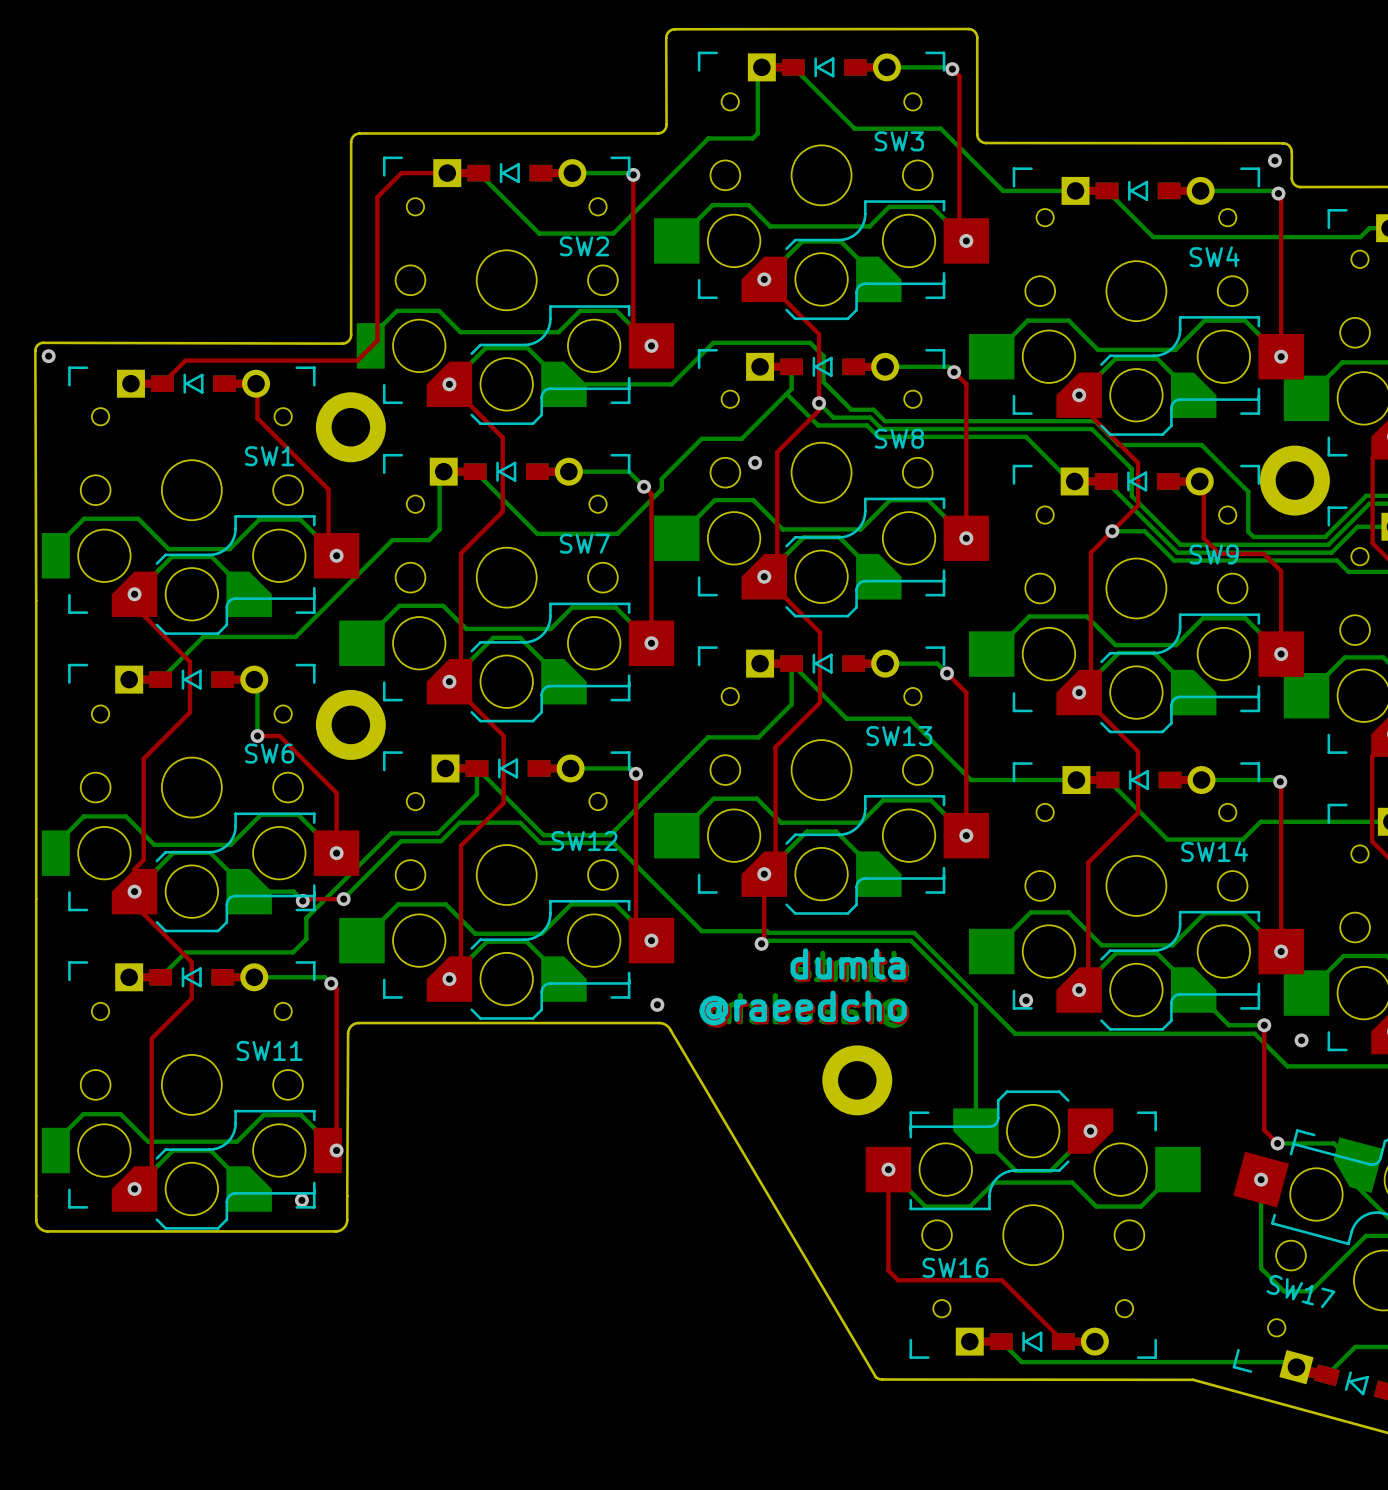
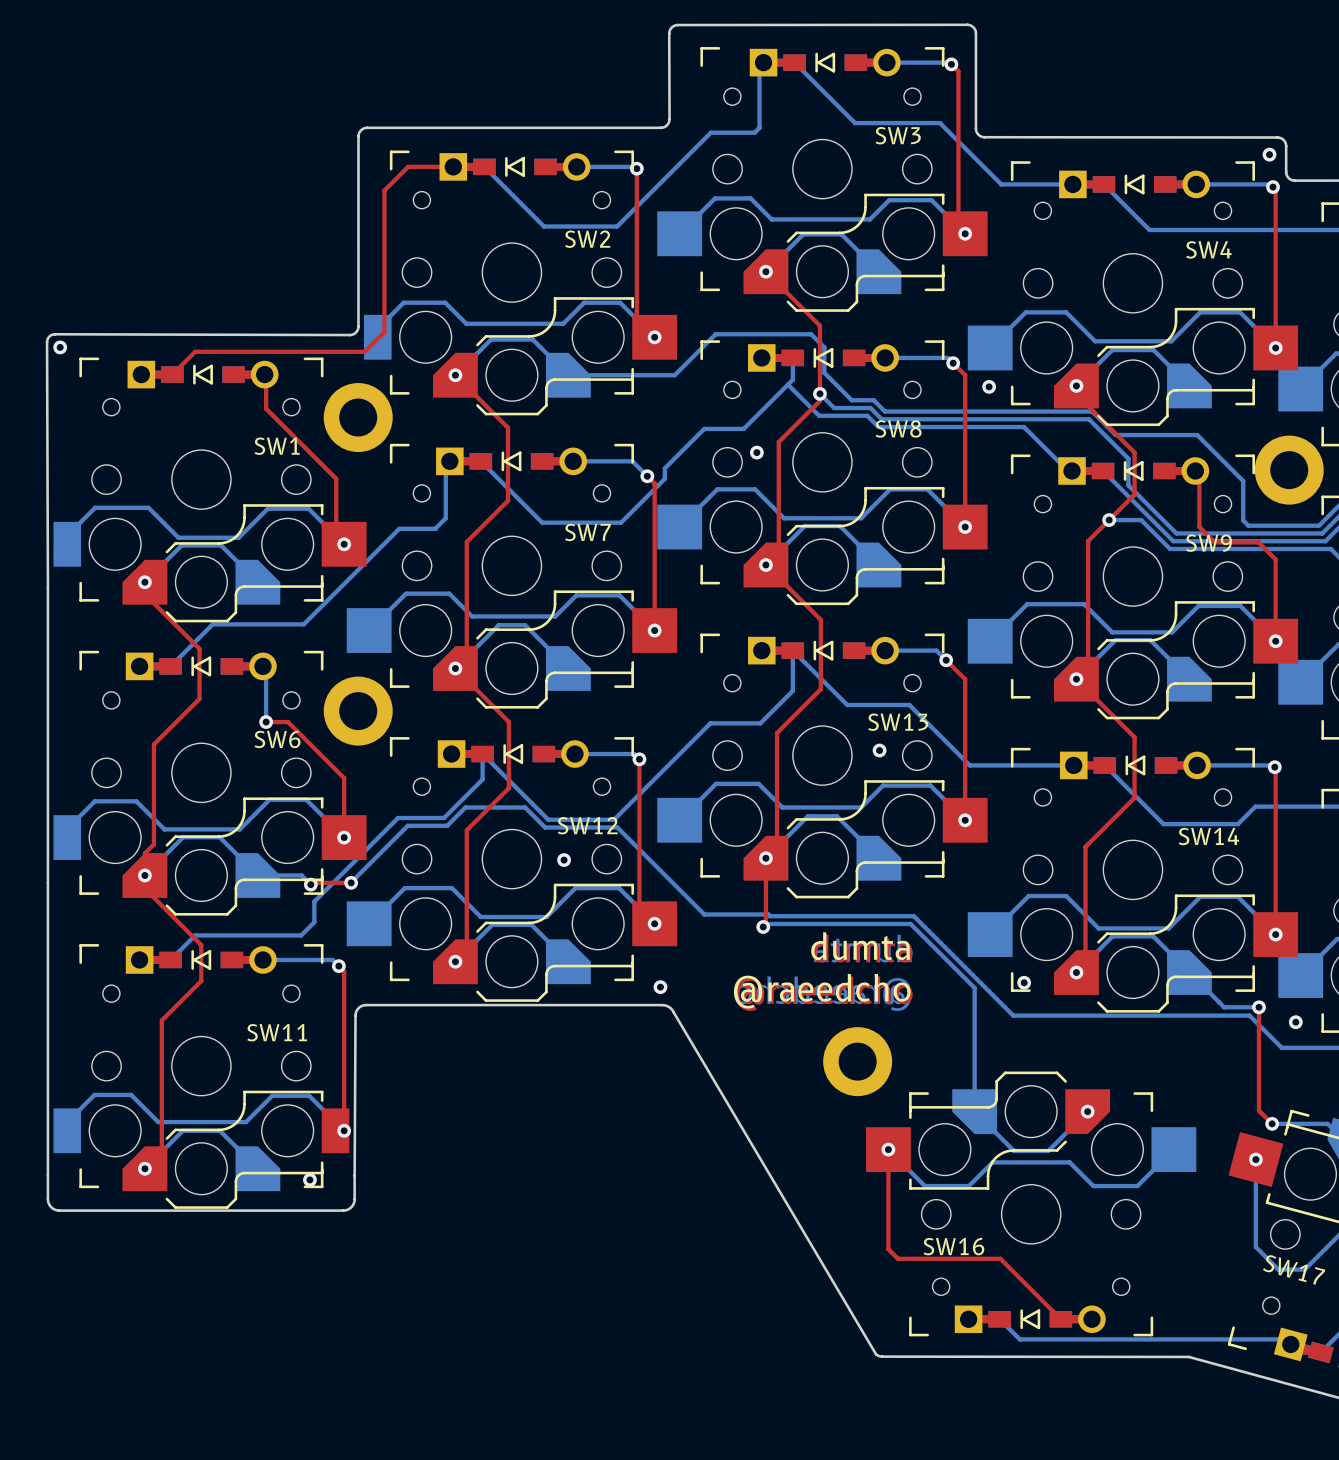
via: none -> (989, 386)
via: none -> (879, 750)
via: none -> (564, 860)

